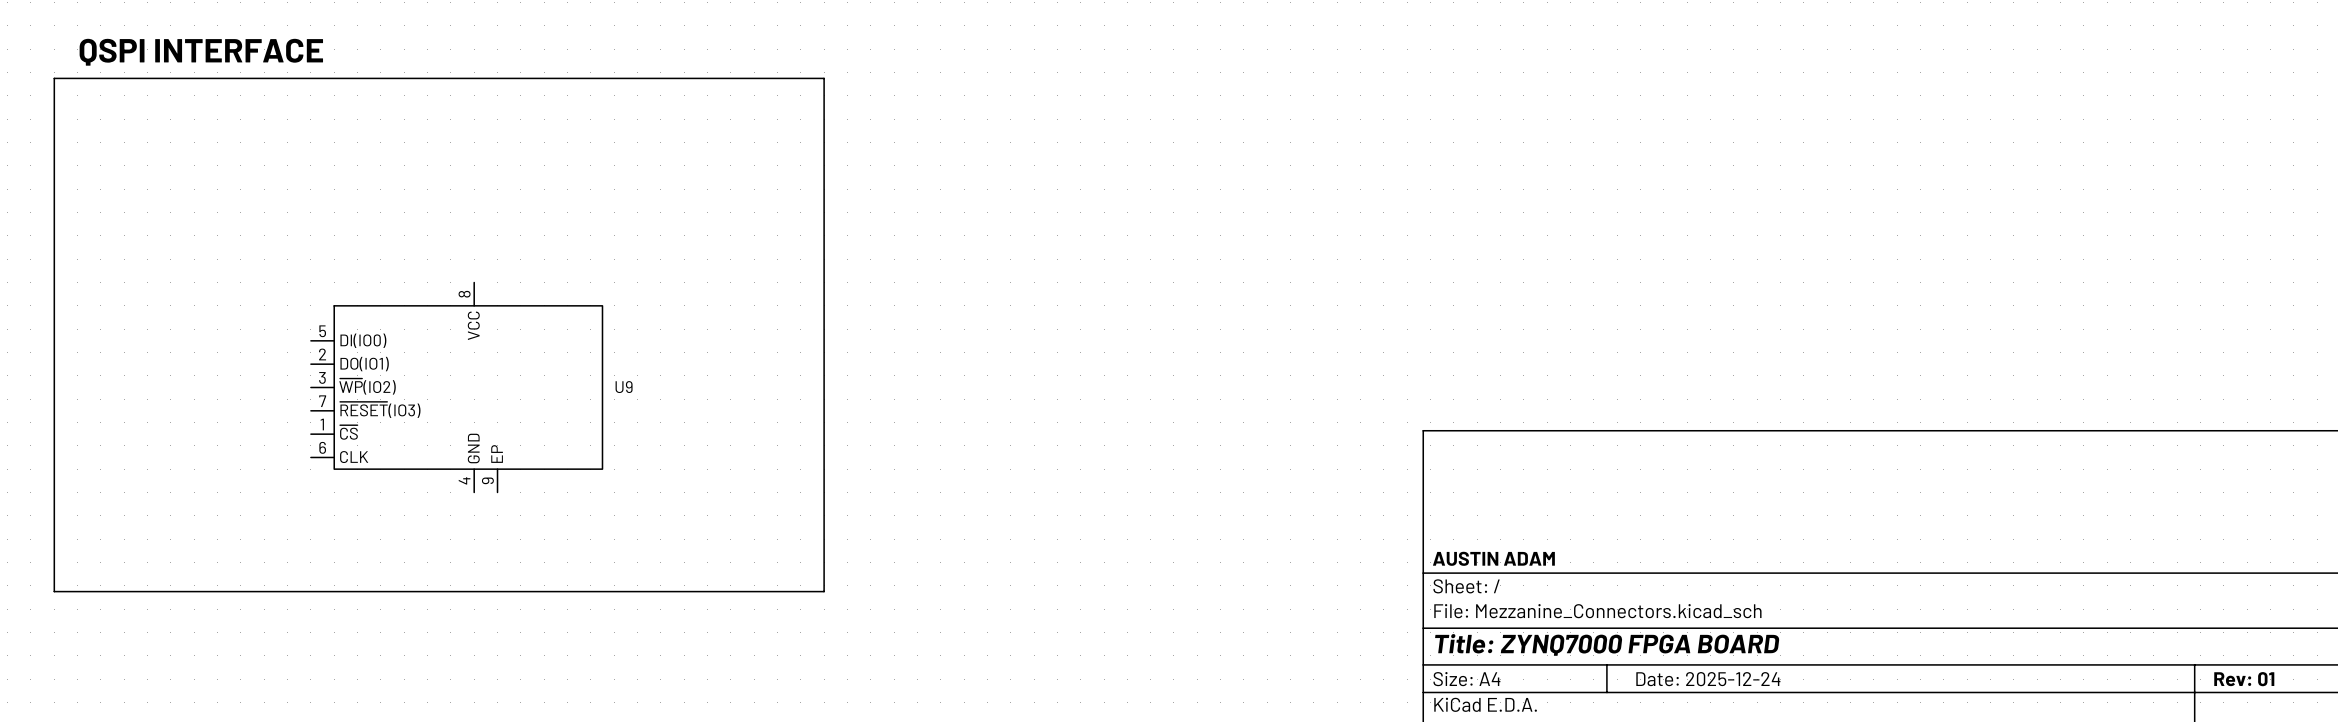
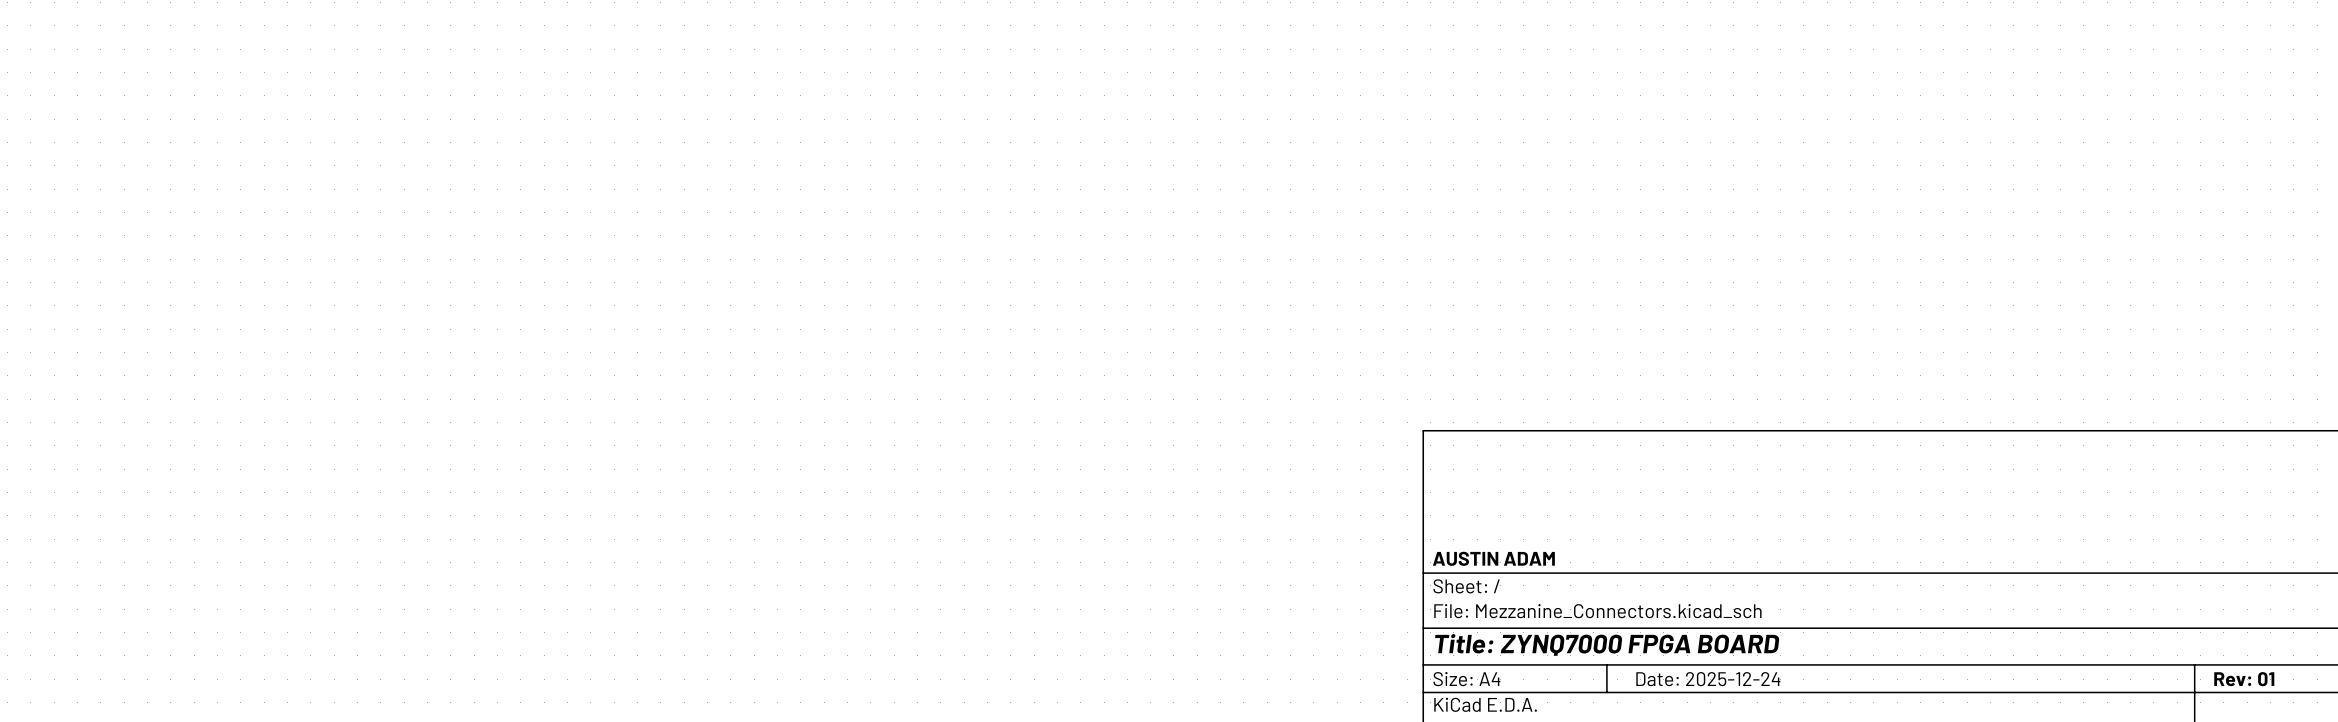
text: QSPI INTERFACE (201, 52) -> none
line: (54, 78) (824, 78) (824, 591) (54, 591) (54, 78) -> none
U9: (456, 387) -> none

